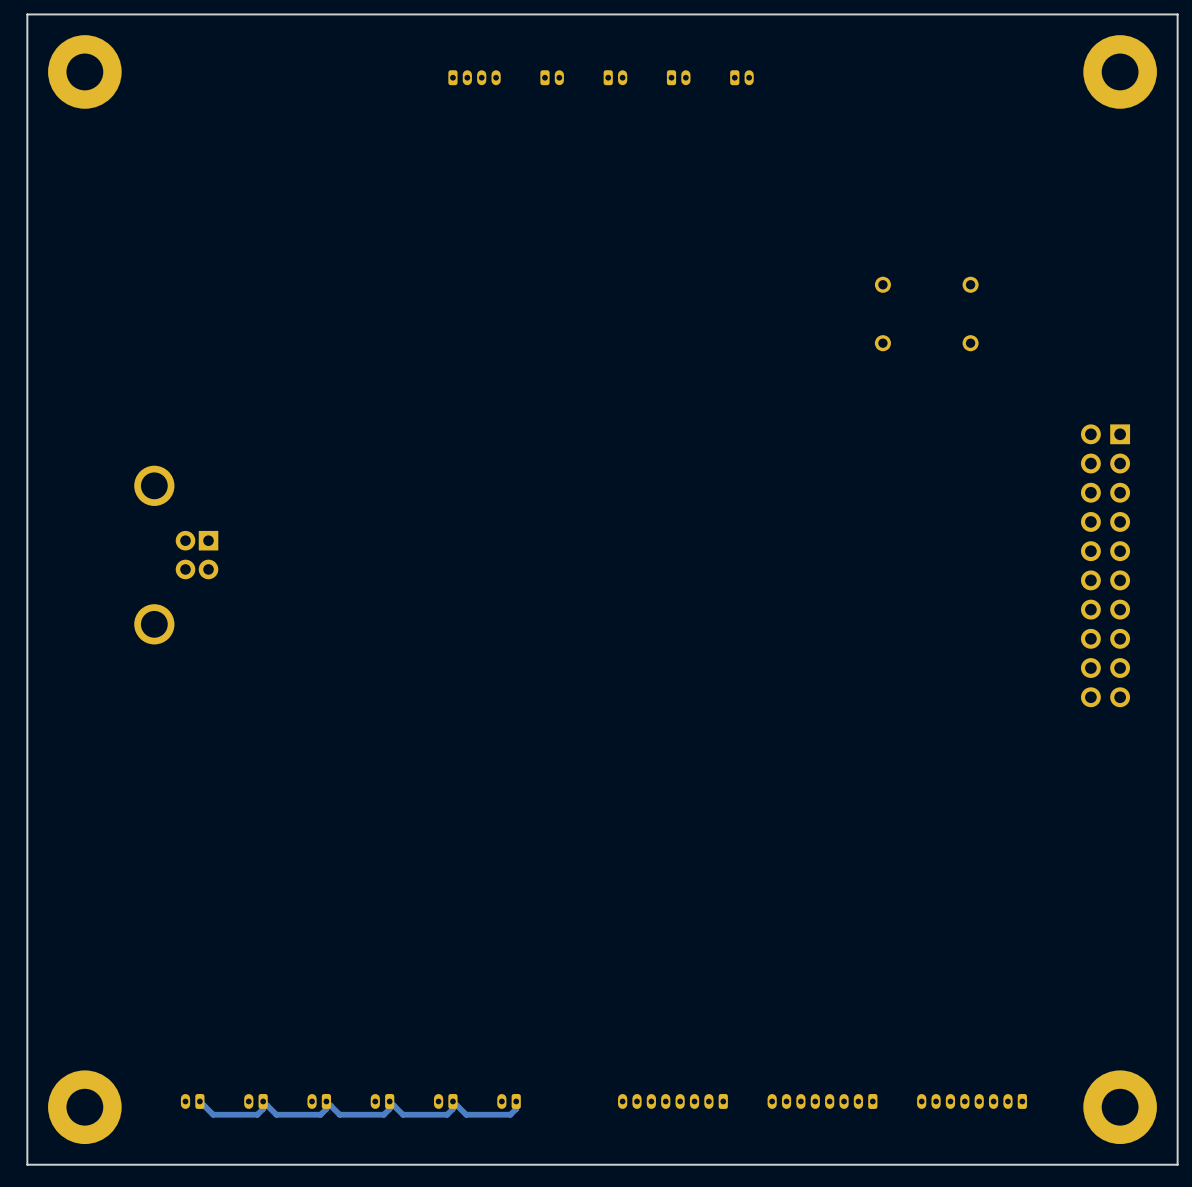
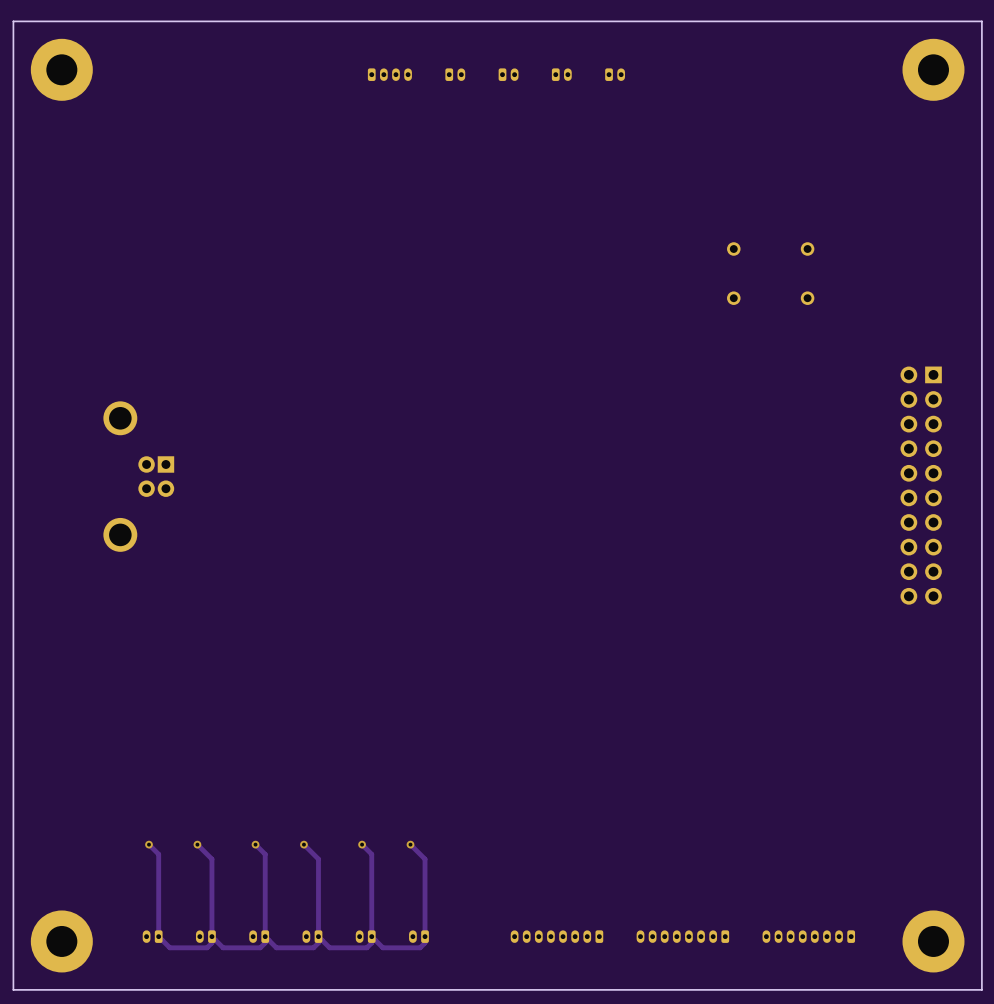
track: none -> (149, 844) (158, 854) (158, 936)
via: none -> (149, 844)
track: none -> (197, 844) (211, 859) (211, 936)
via: none -> (197, 844)
track: none -> (255, 844) (265, 854) (265, 936)
via: none -> (255, 844)
track: none -> (303, 844) (318, 859) (318, 936)
via: none -> (303, 844)
track: none -> (362, 844) (371, 854) (371, 936)
via: none -> (362, 844)
track: none -> (410, 844) (425, 859) (425, 936)
via: none -> (410, 844)

